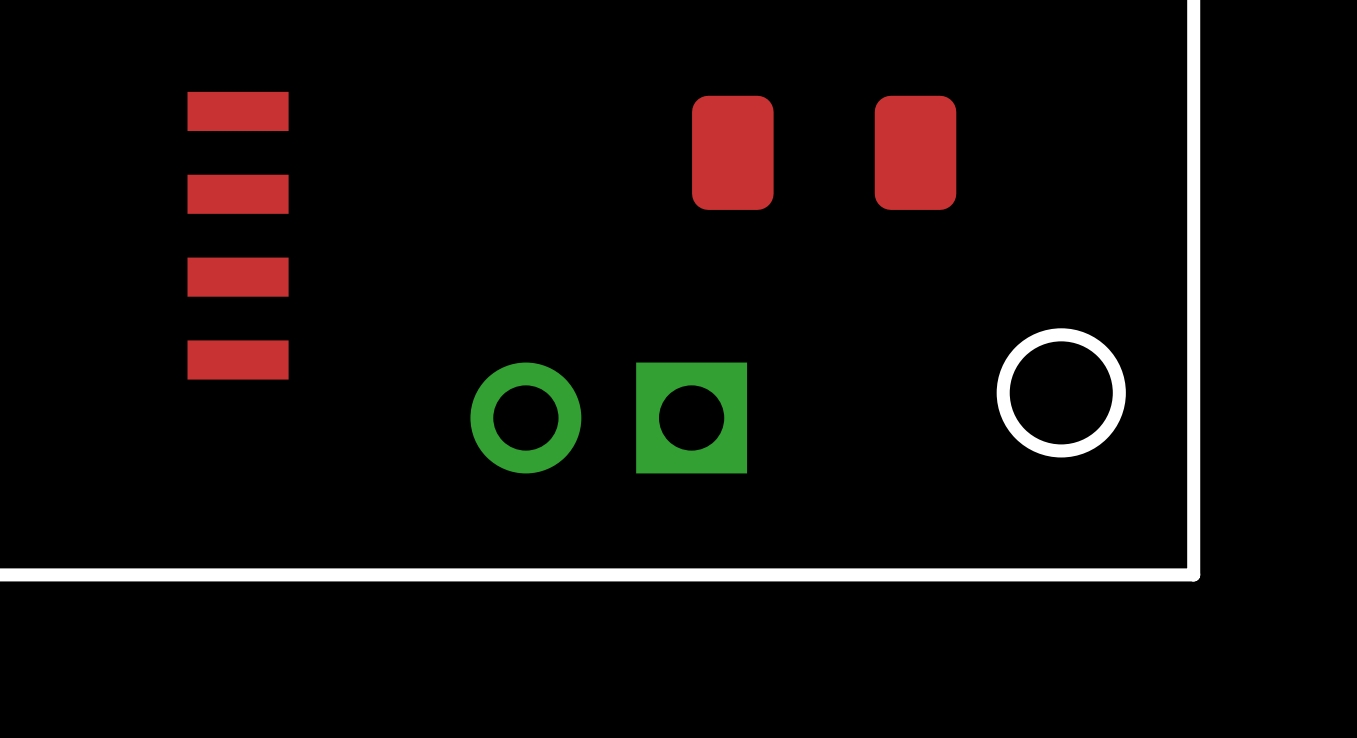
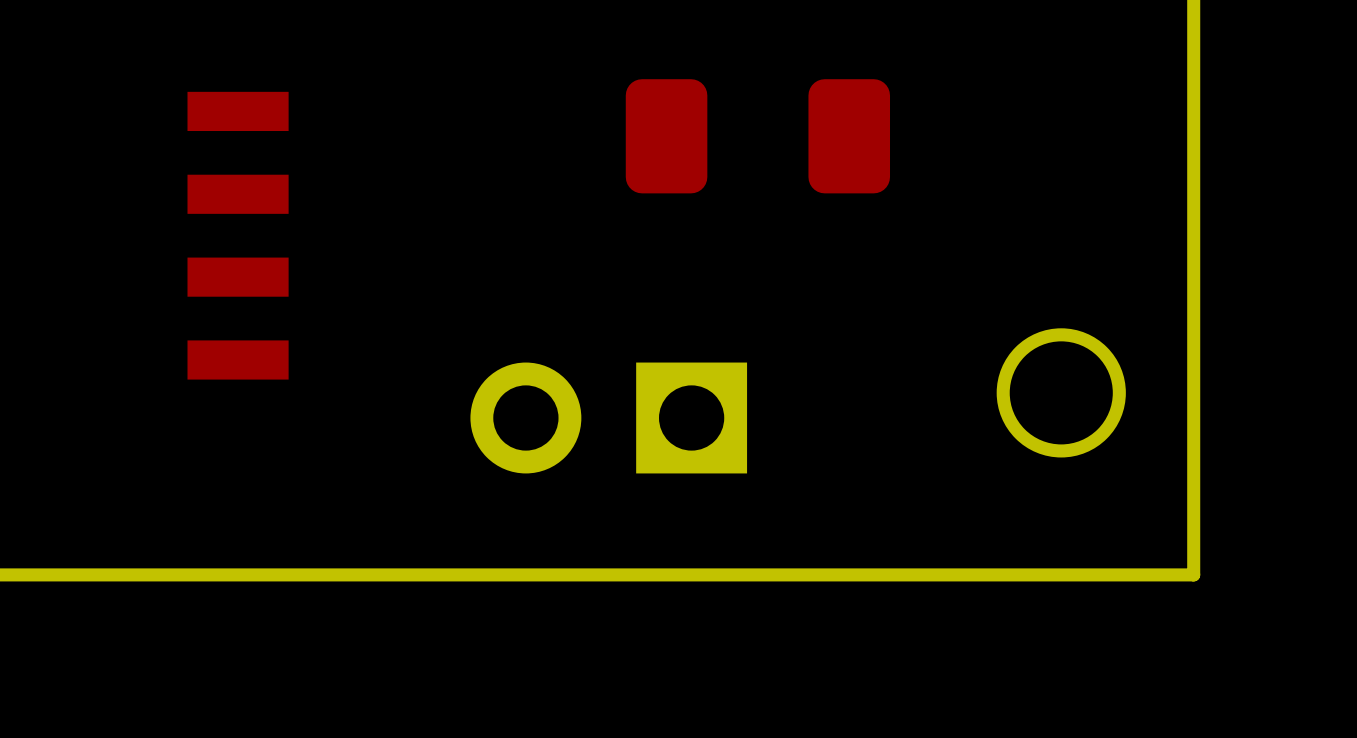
part position: (824, 152) -> (757, 136)

